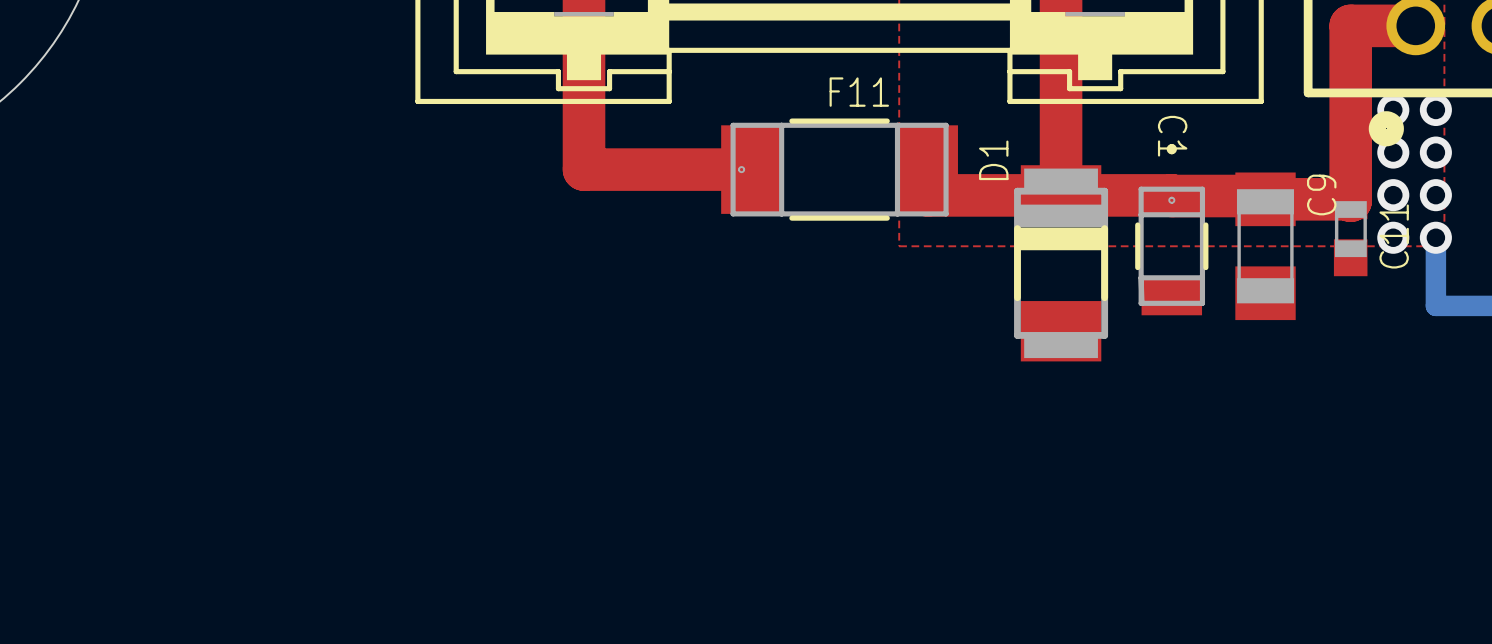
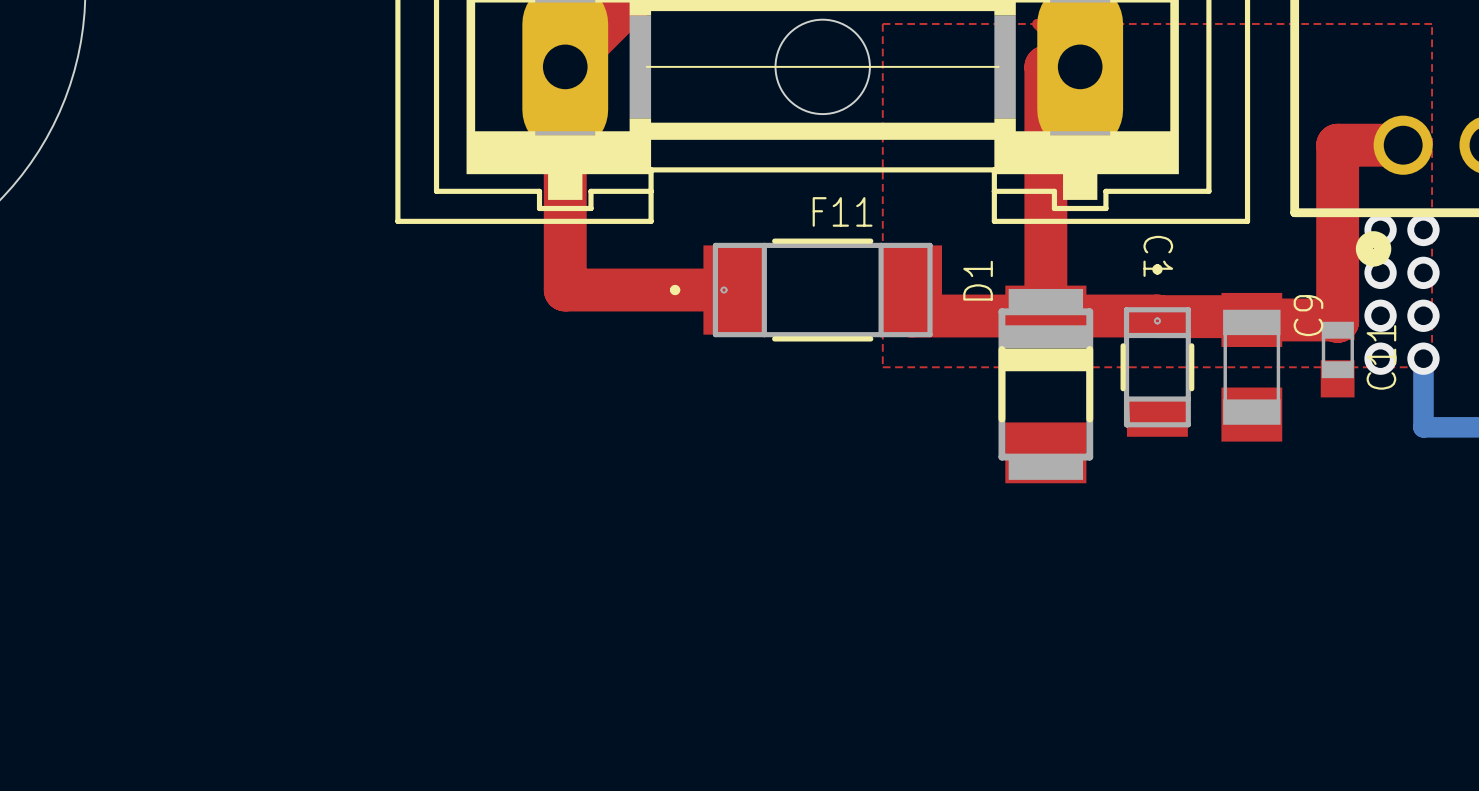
F11 footprint: [721, 118, 958, 221] -> [669, 238, 943, 342]

